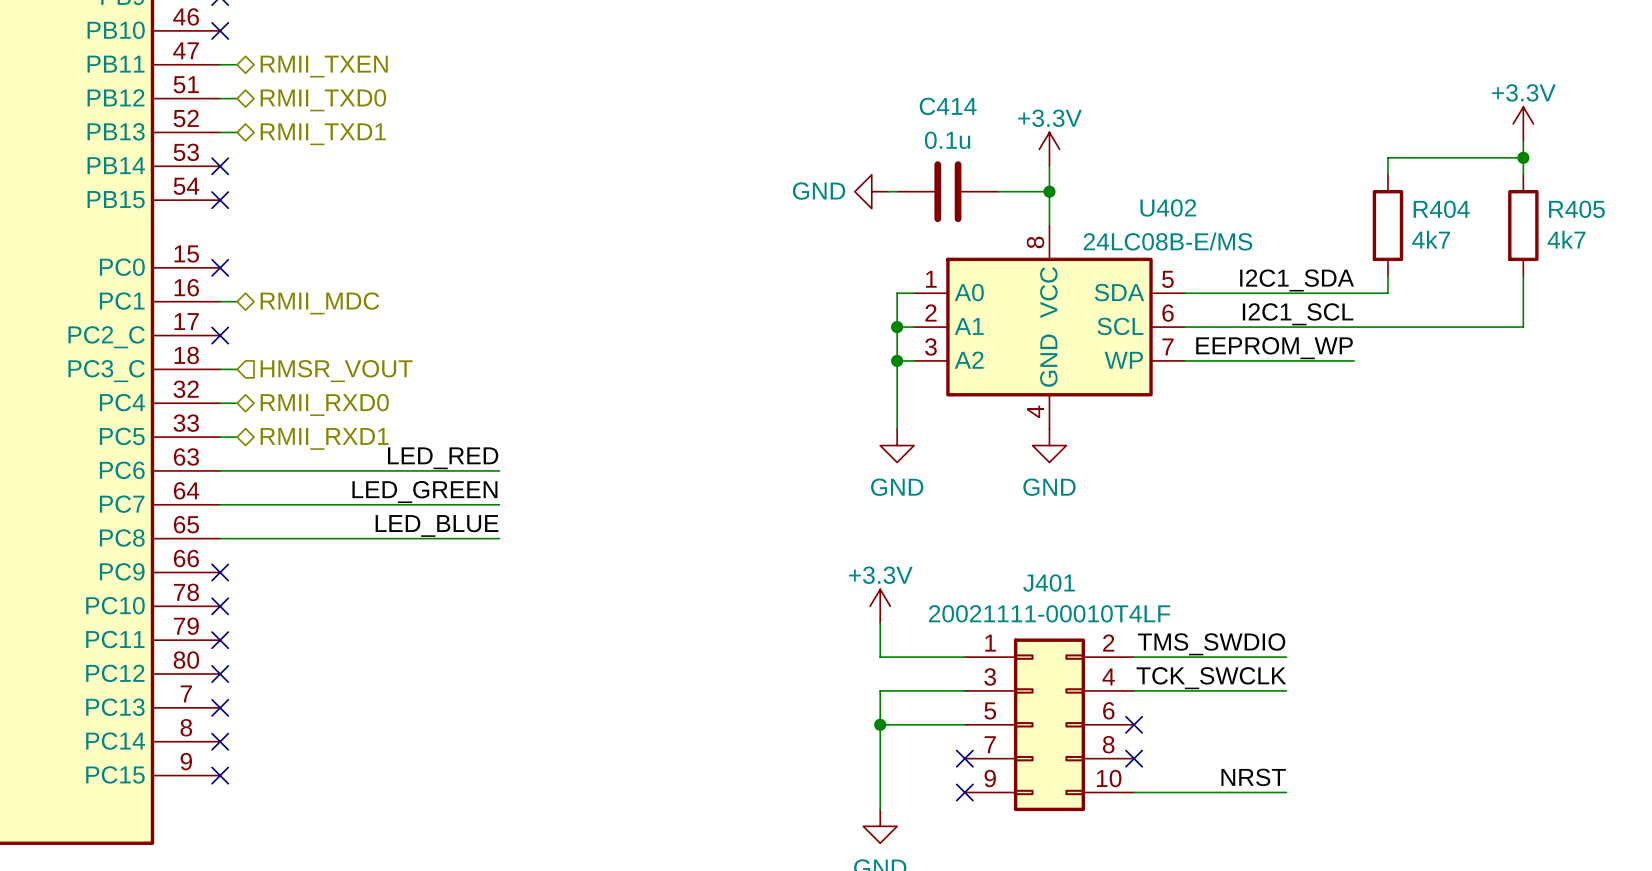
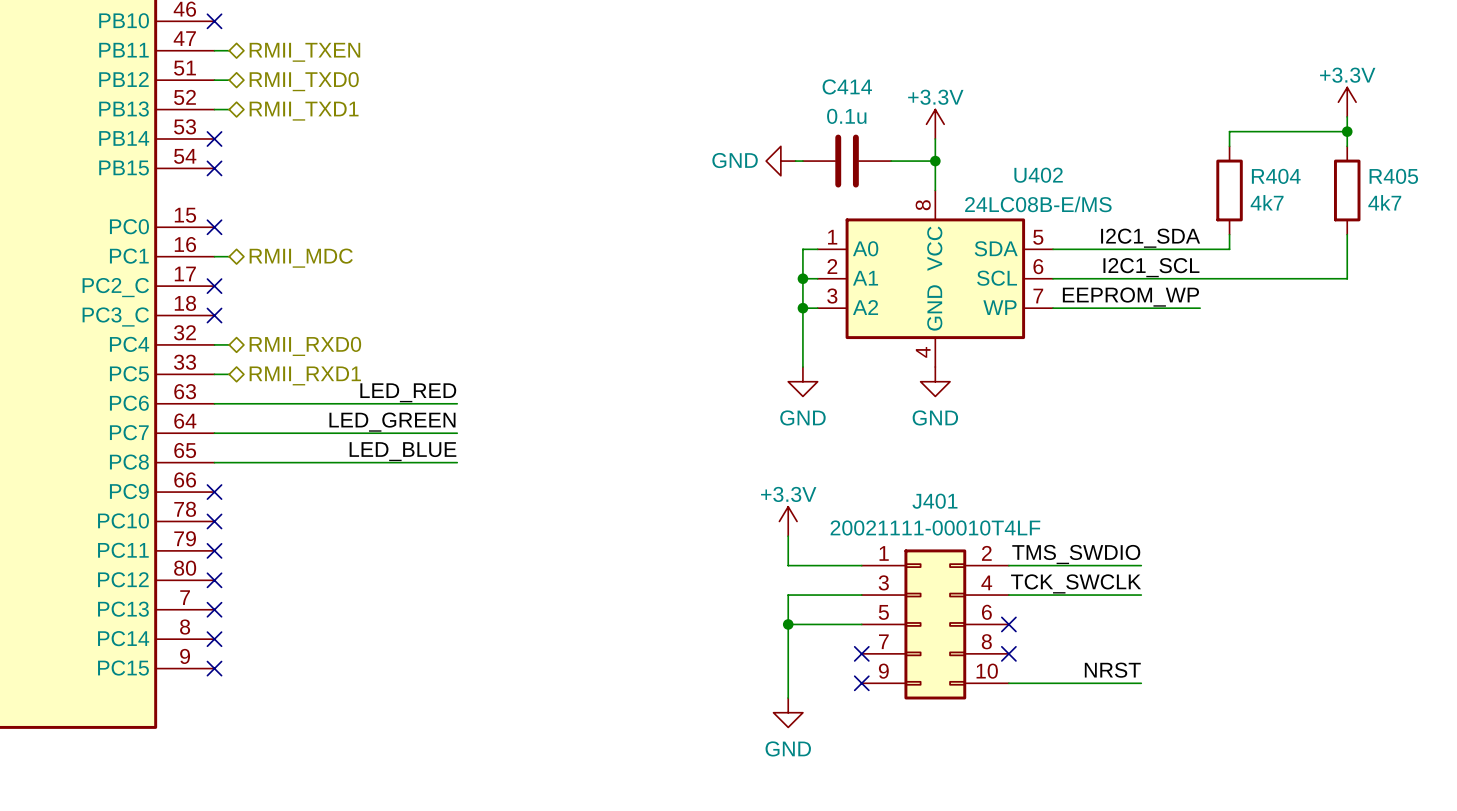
wire: (220, 369) (237, 369) -> none
no-connect mark: none -> (214, 315)
hierarchical label: HMSR_VOUT (336, 371) -> none

